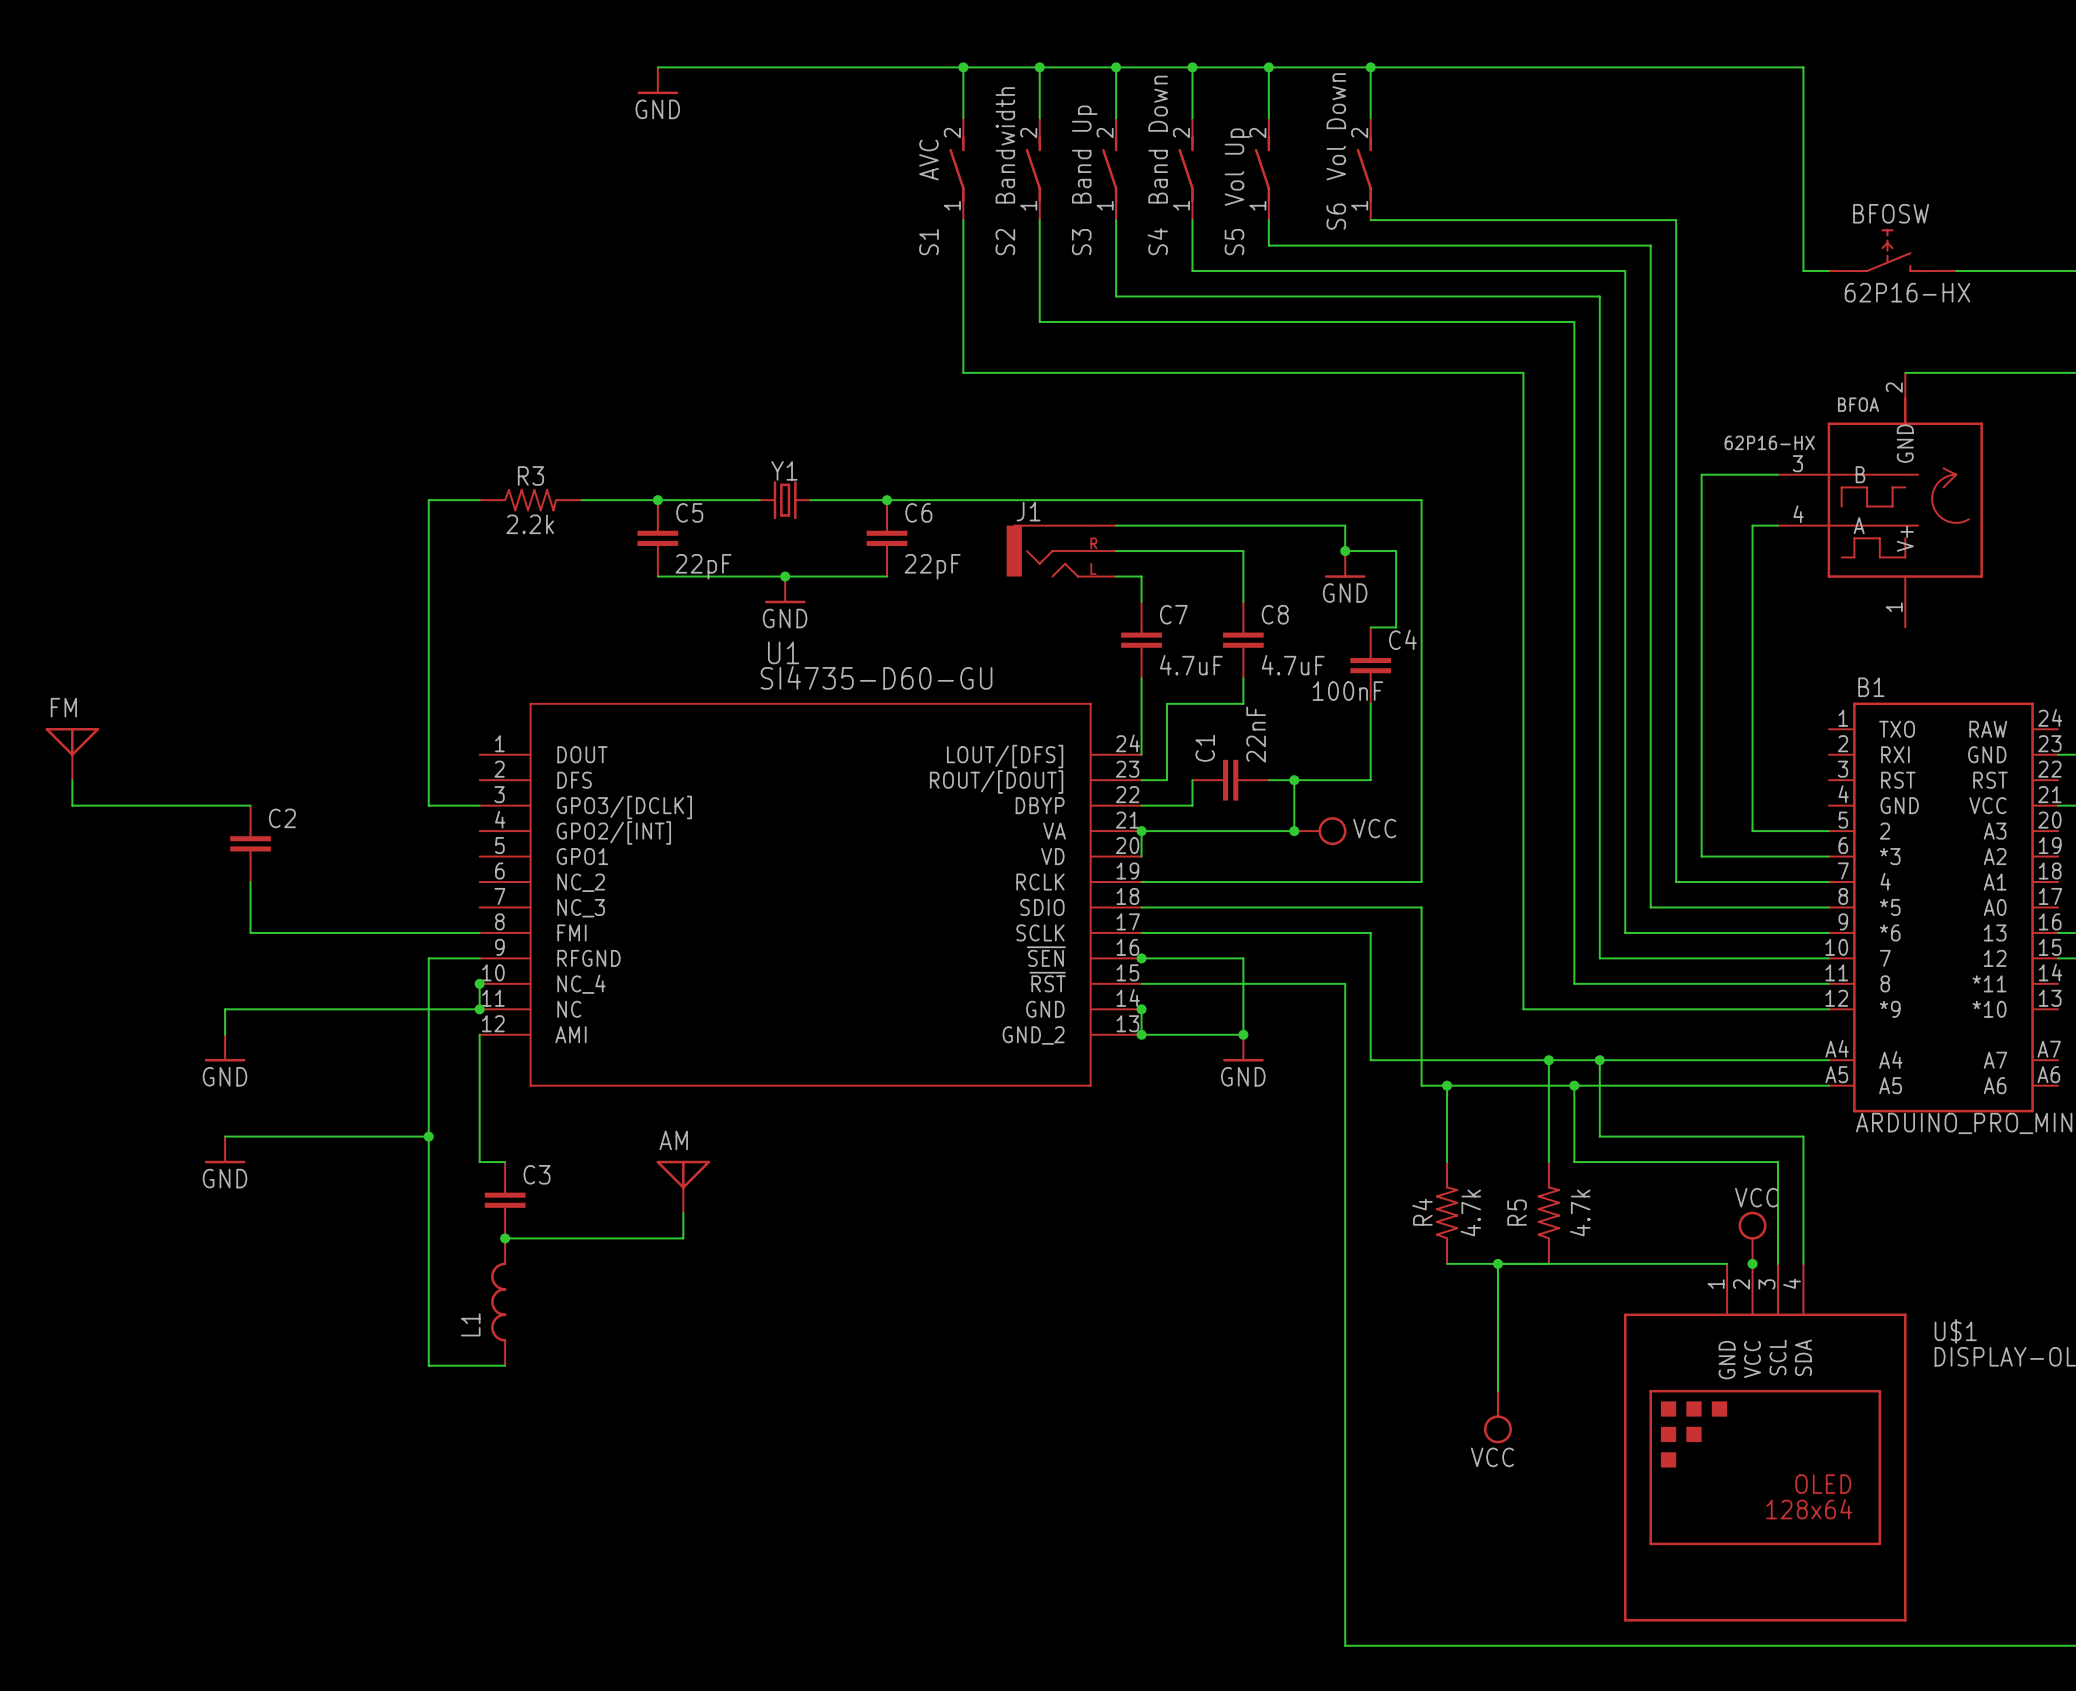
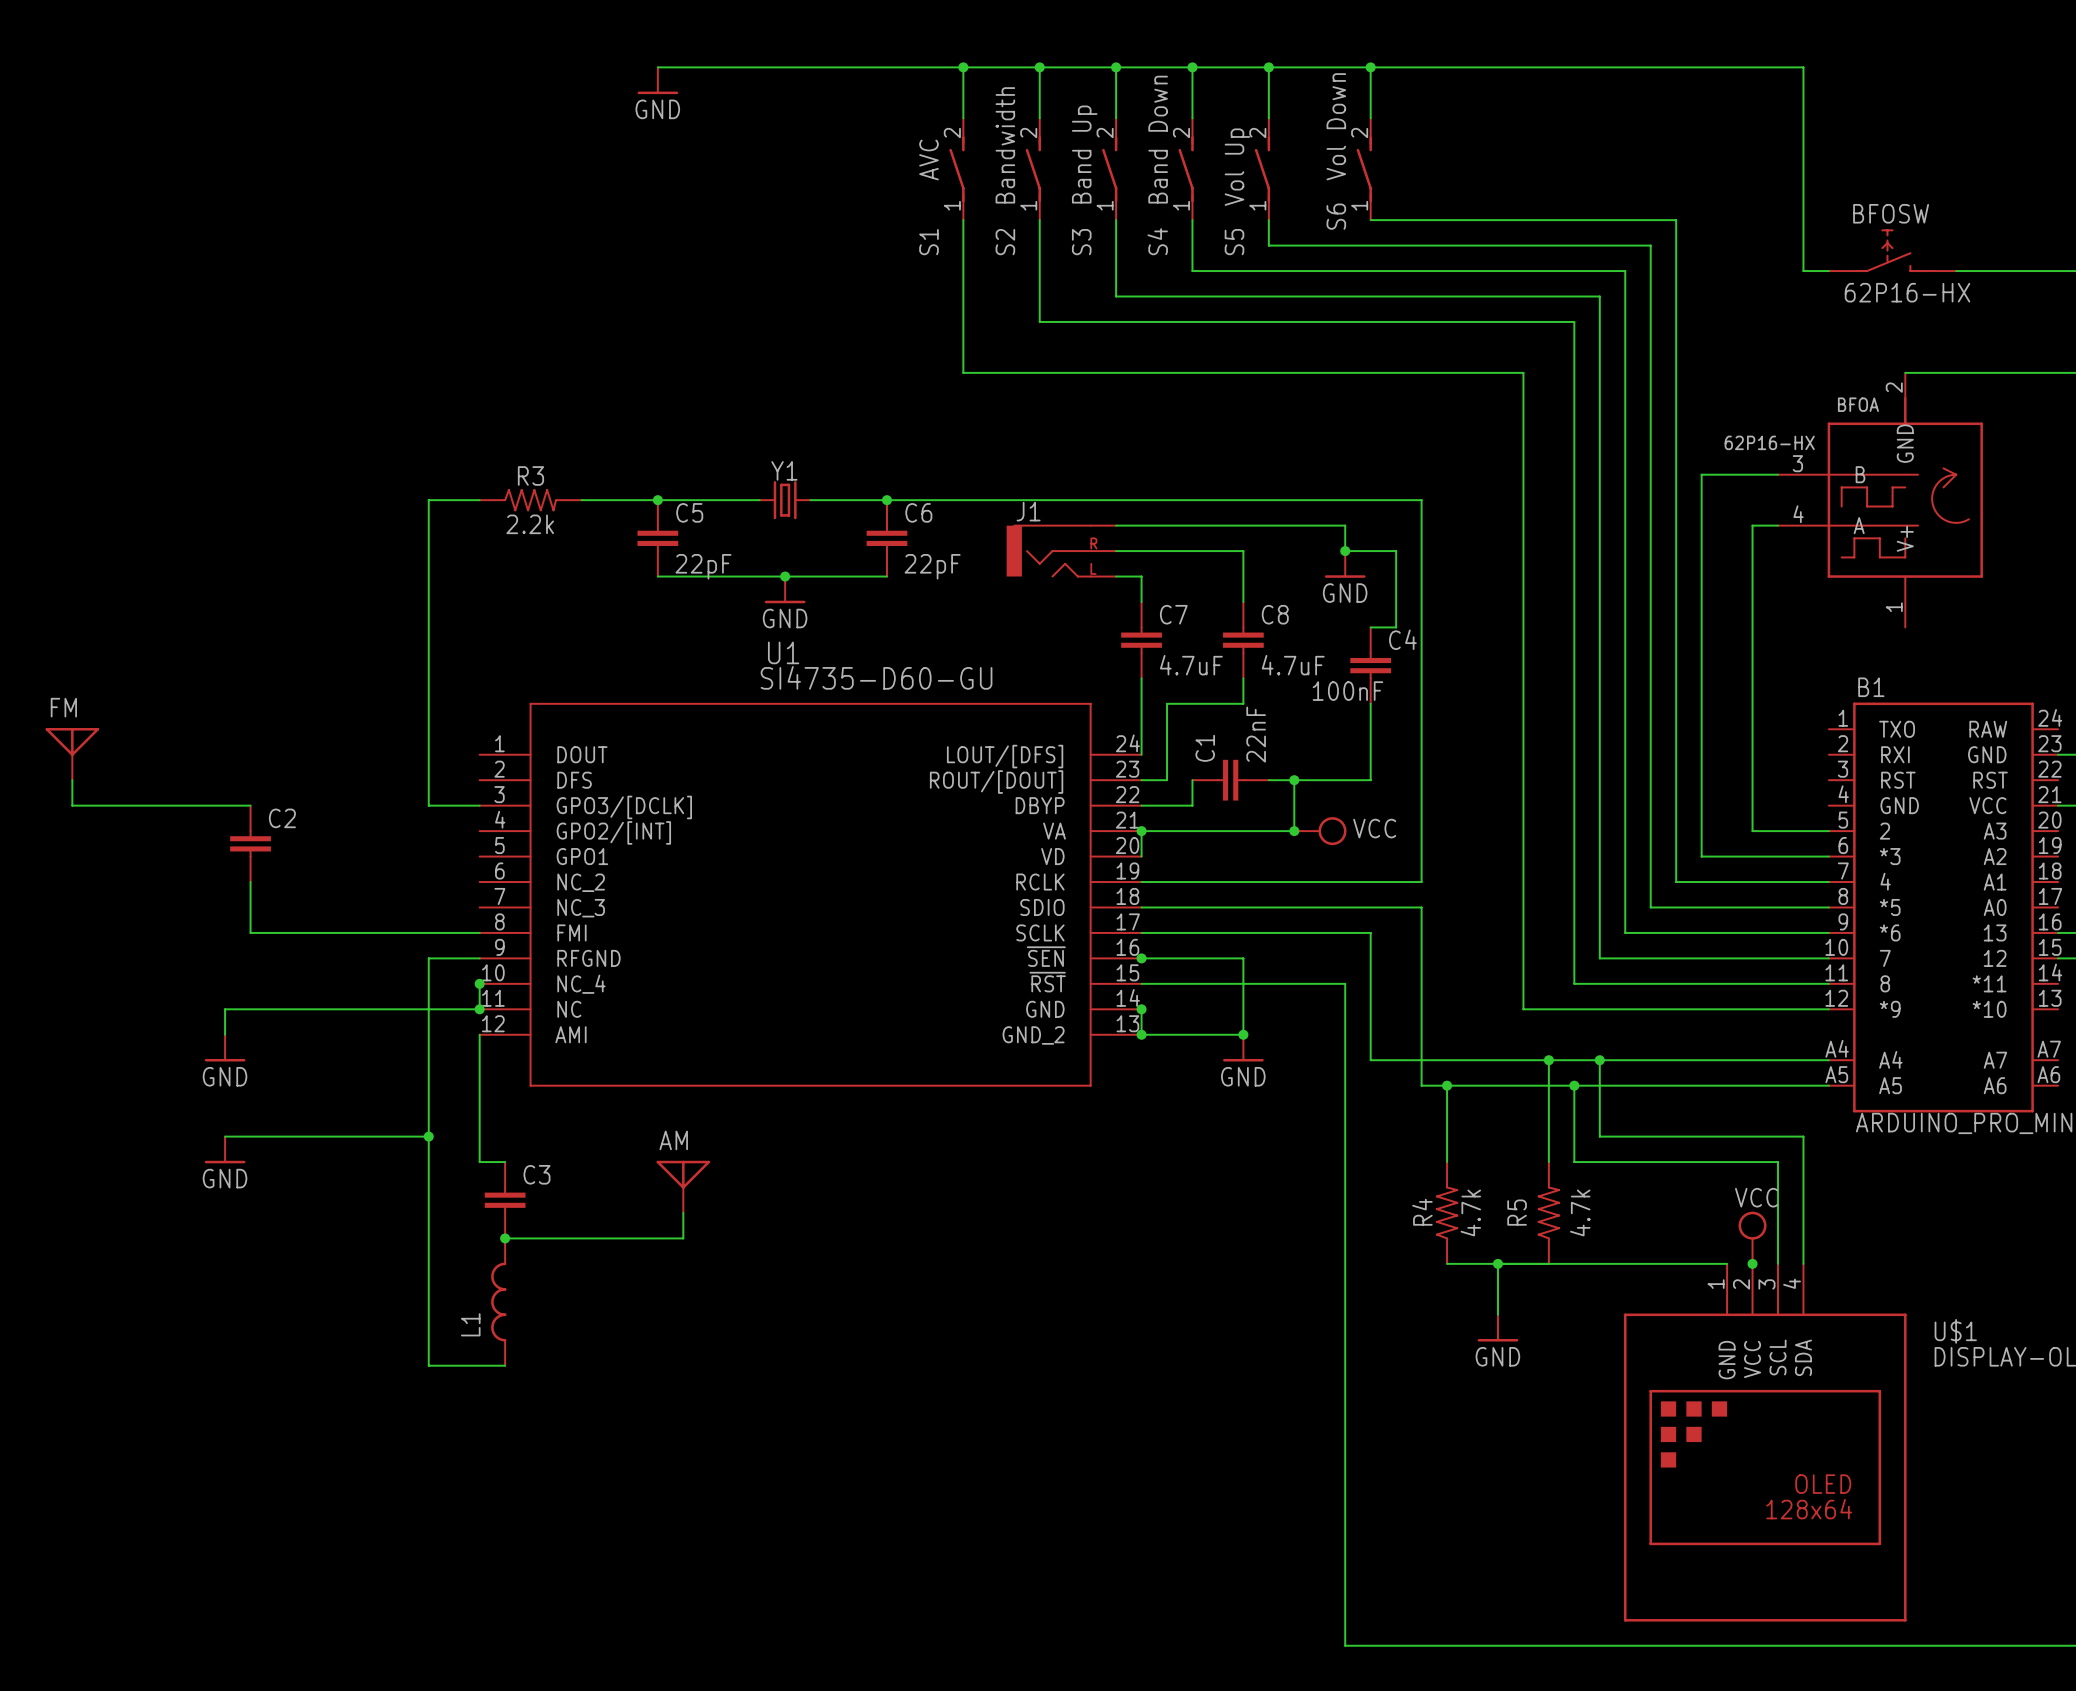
wire: (1497, 1314) (1497, 1391) -> none
power symbol: none -> GND (1497, 1328)
power symbol: VCC (1497, 1417) -> none

